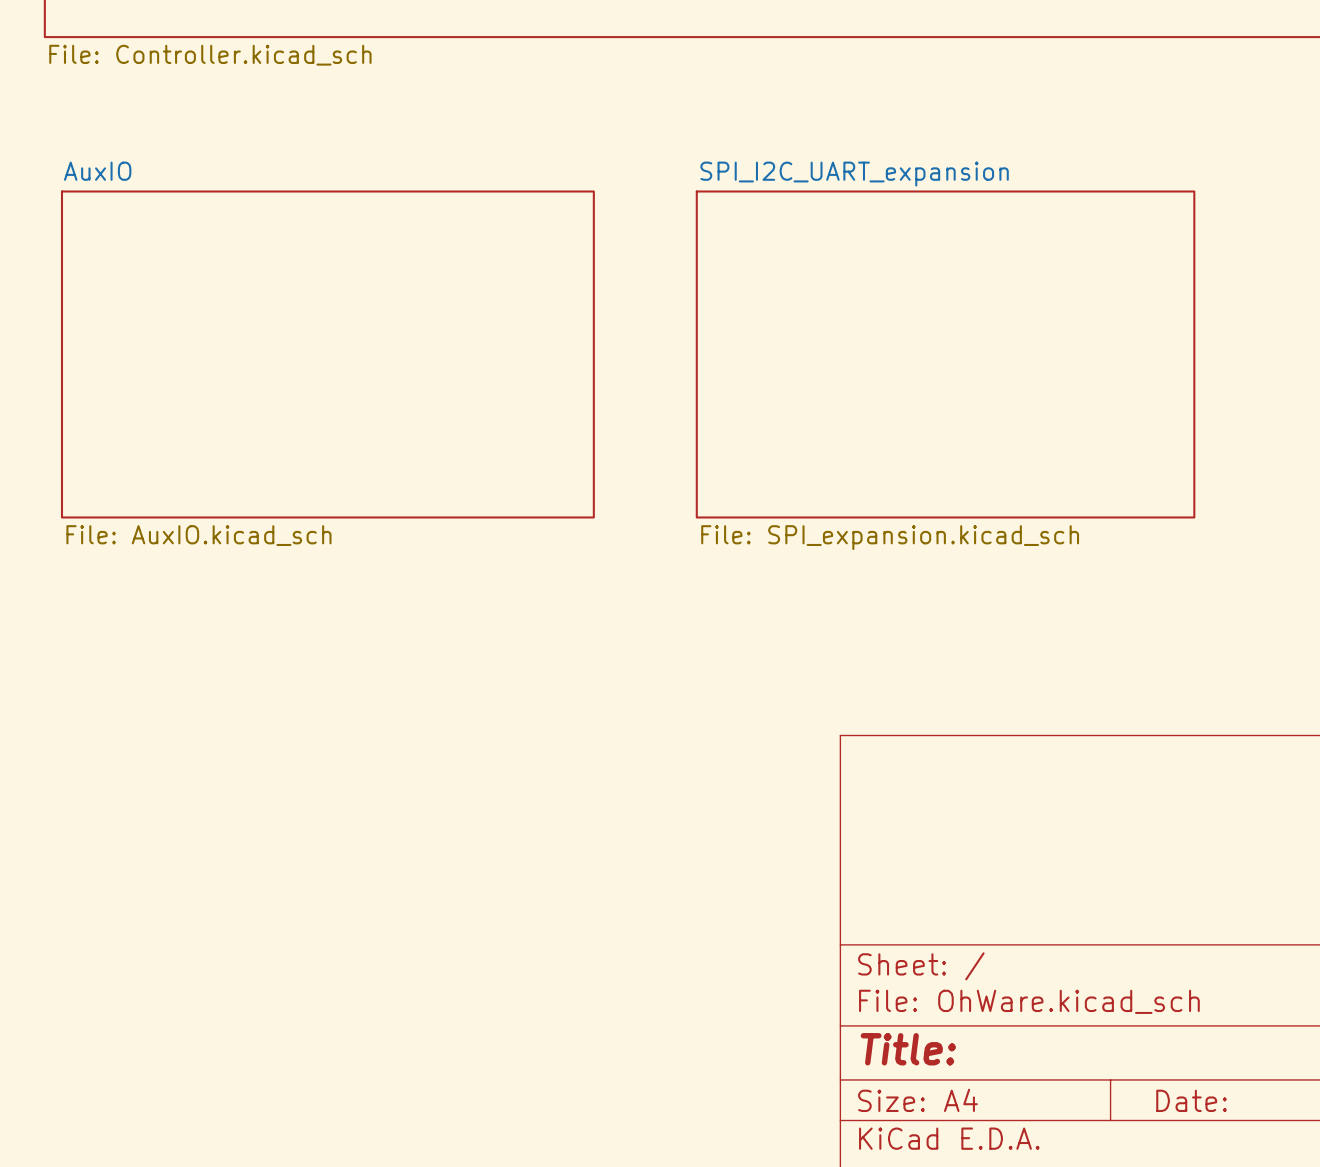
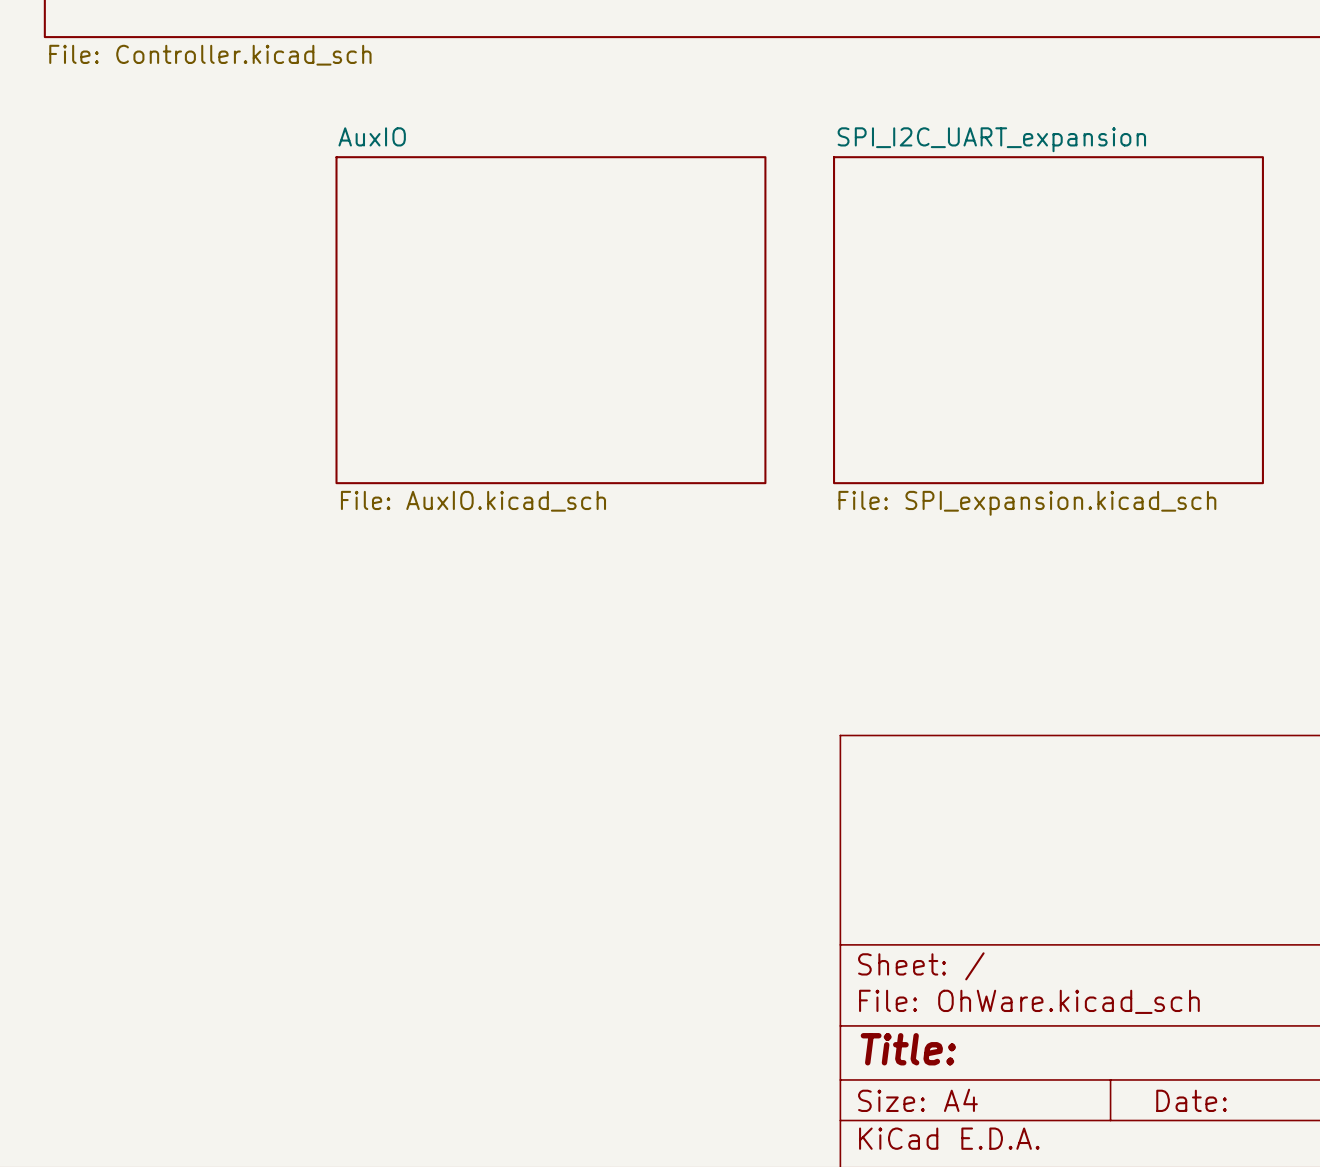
sheet SPI_I2C_UART_expansion name position: SPI_I2C_UART_expansion (854, 174) -> SPI_I2C_UART_expansion (991, 139)
sheet SPI_I2C_UART_expansion shape: [695, 190, 1196, 519] -> [833, 156, 1264, 485]
sheet AuxIO: none -> File: AuxIO.kicad_sch (550, 320)
sheet AuxIO: File: AuxIO.kicad_sch (327, 354) -> none
sheet SPI_I2C_UART_expansion value position: File: SPI_expansion.kicad_sch (890, 537) -> File: SPI_expansion.kicad_sch (1027, 503)

